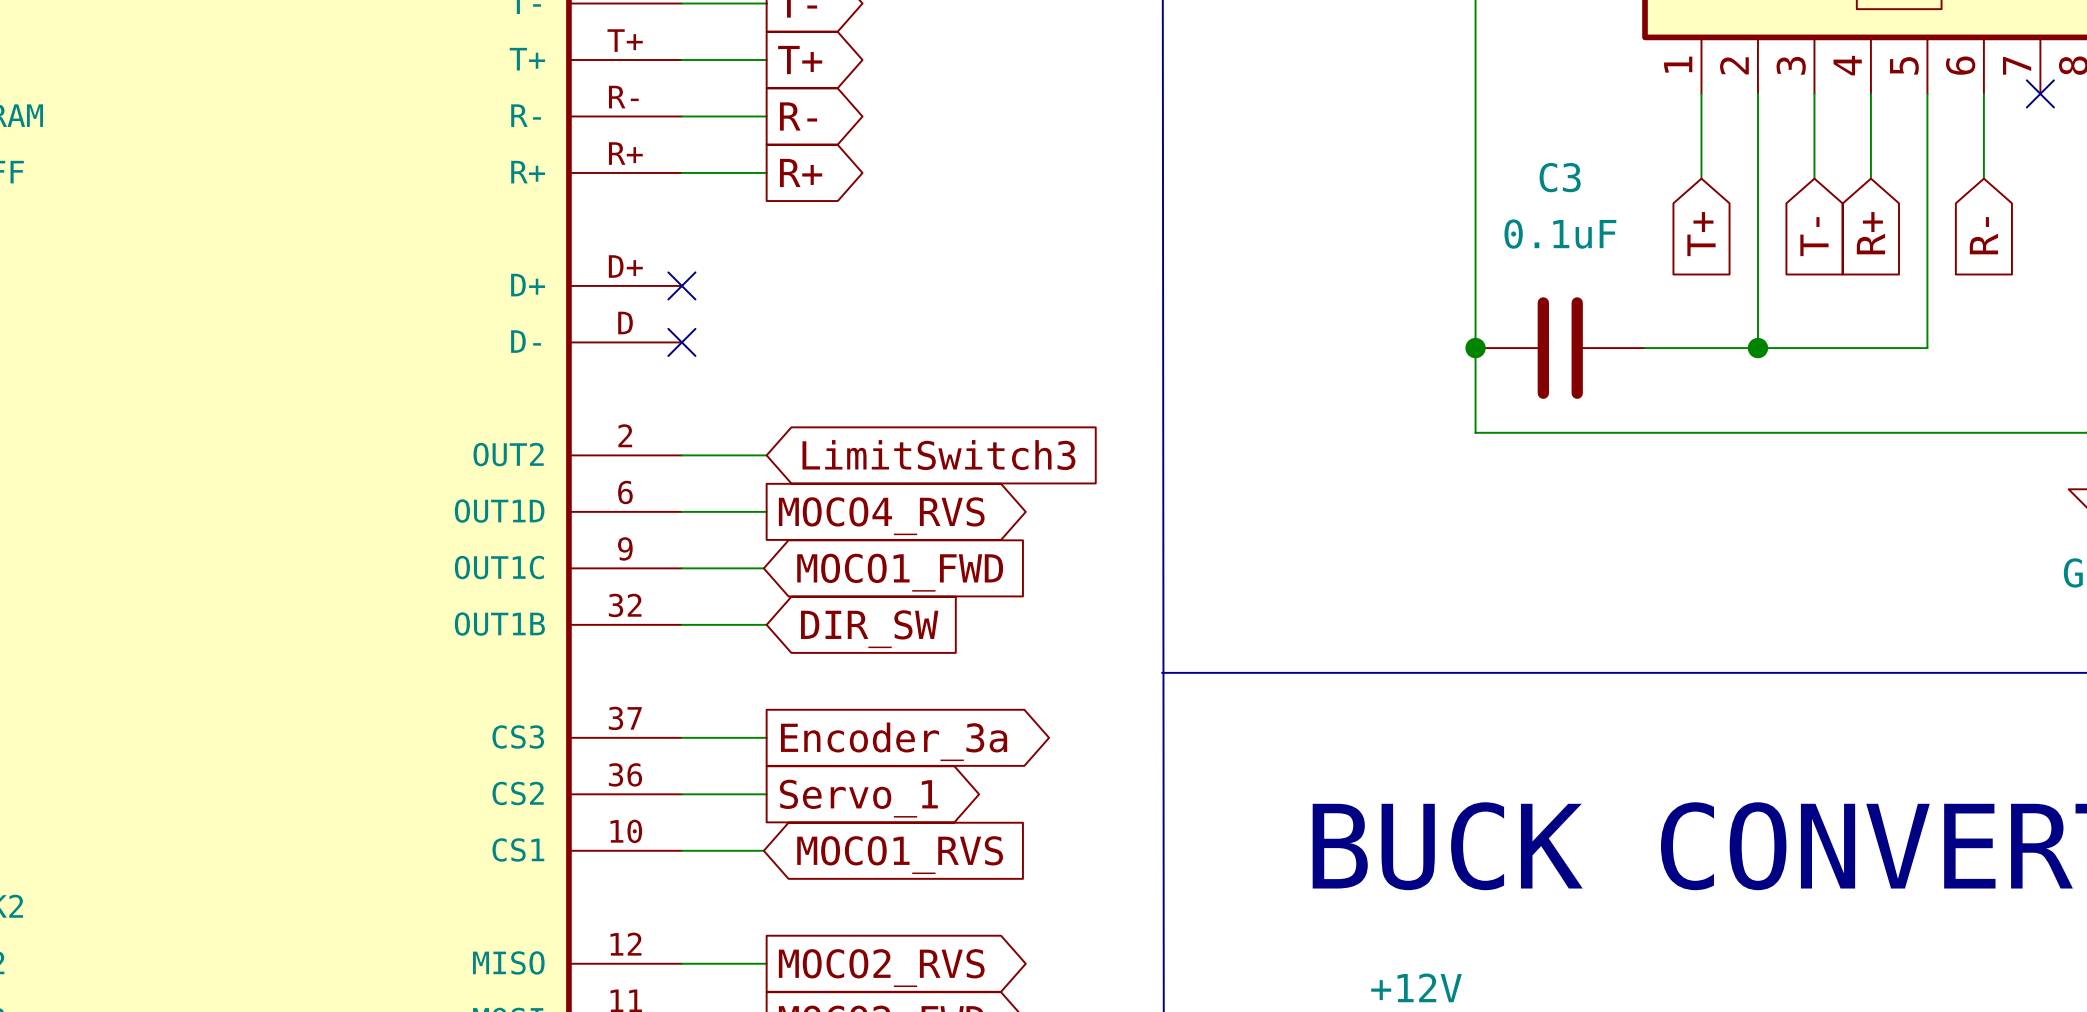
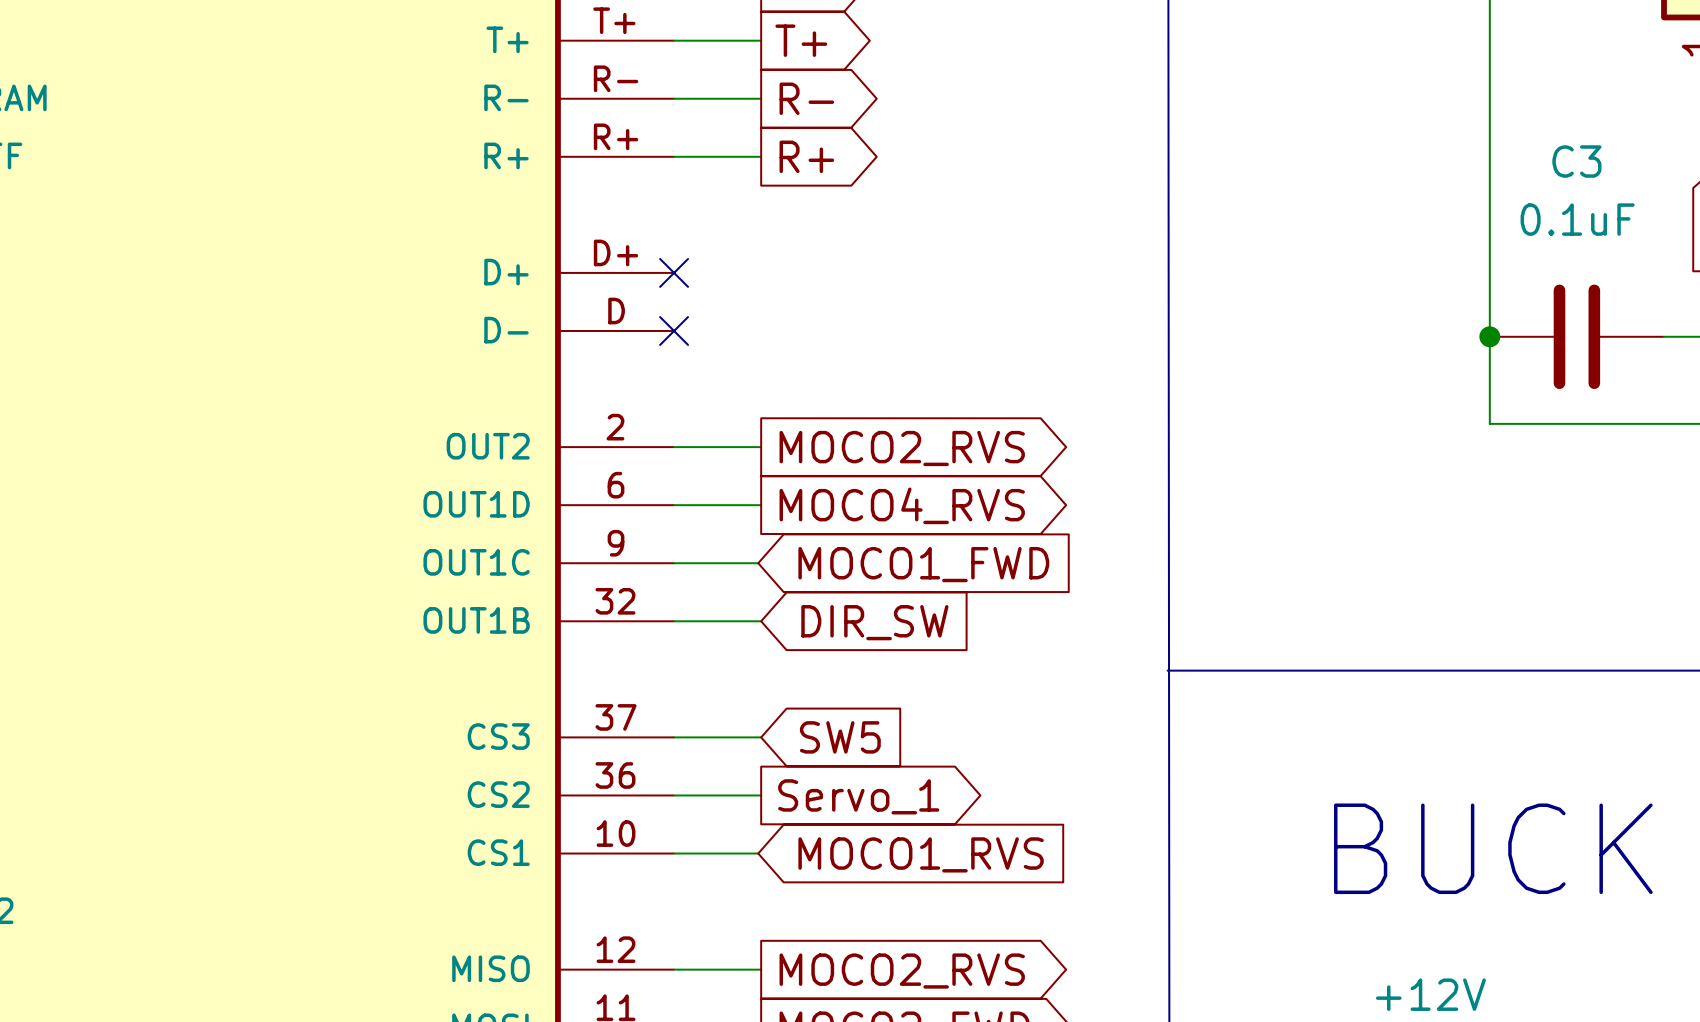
global label shape: input (938, 455) -> output (902, 448)
global label: LimitSwitch3 (938, 455) -> MOCO2_RVS (902, 448)
global label shape: output (894, 741) -> input (840, 737)
global label: Encoder_3a (894, 741) -> SW5 (840, 737)

